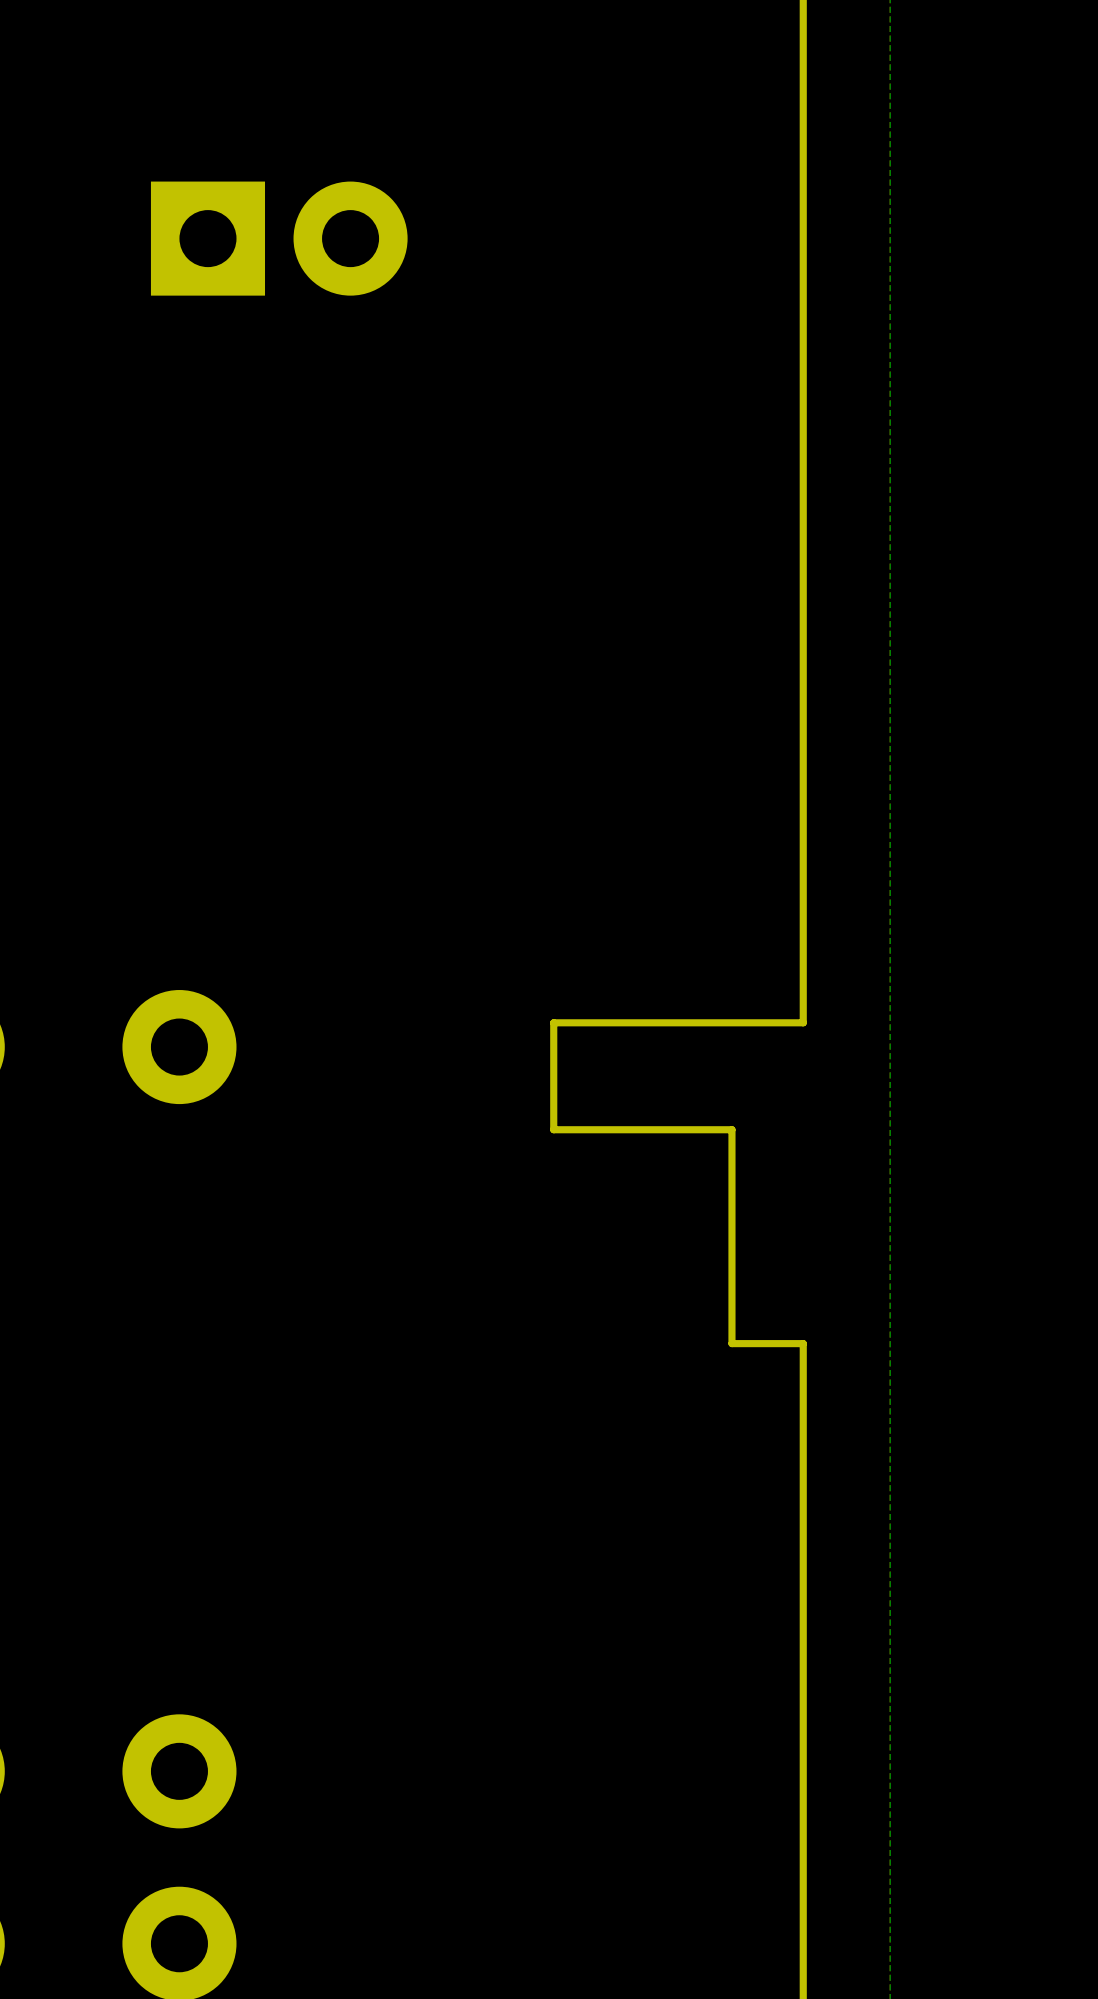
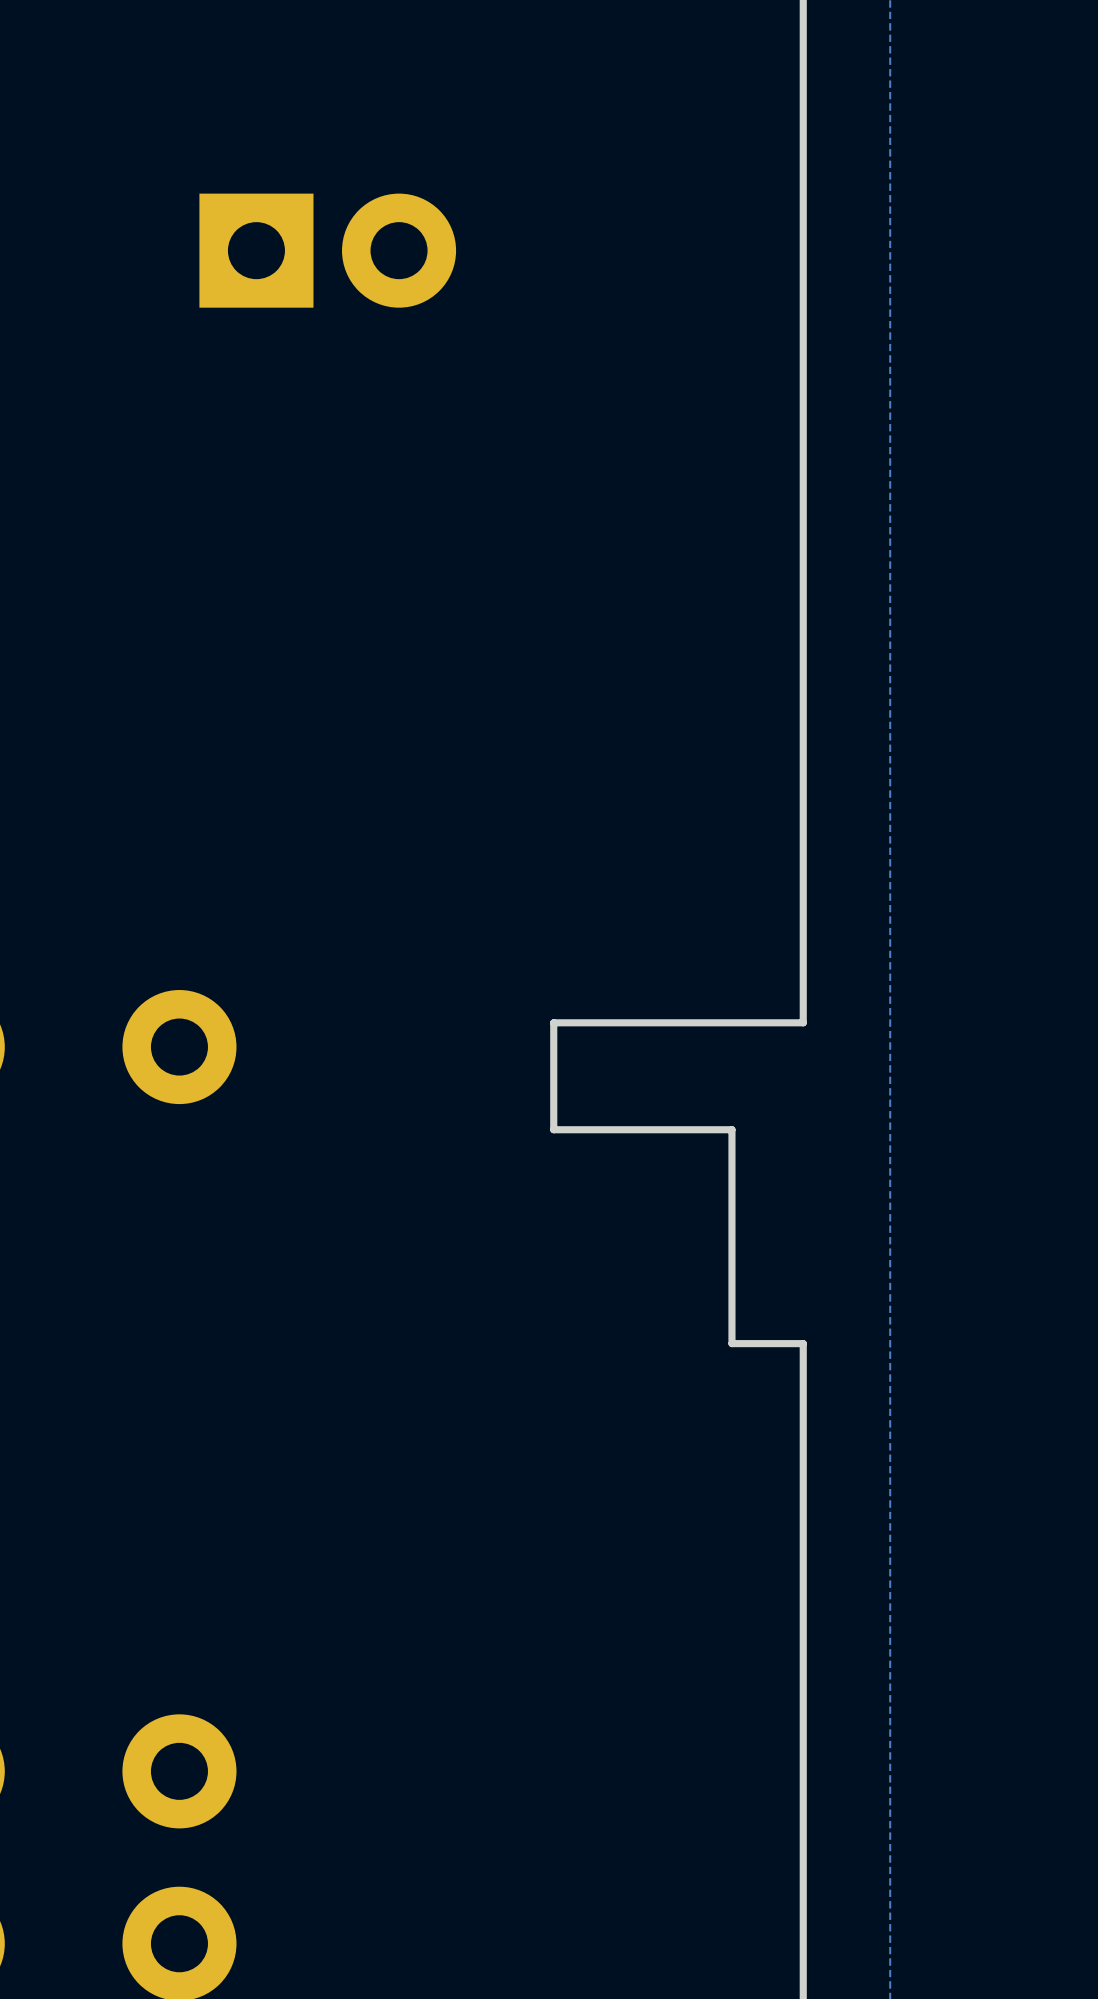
part position: (279, 238) -> (327, 250)

